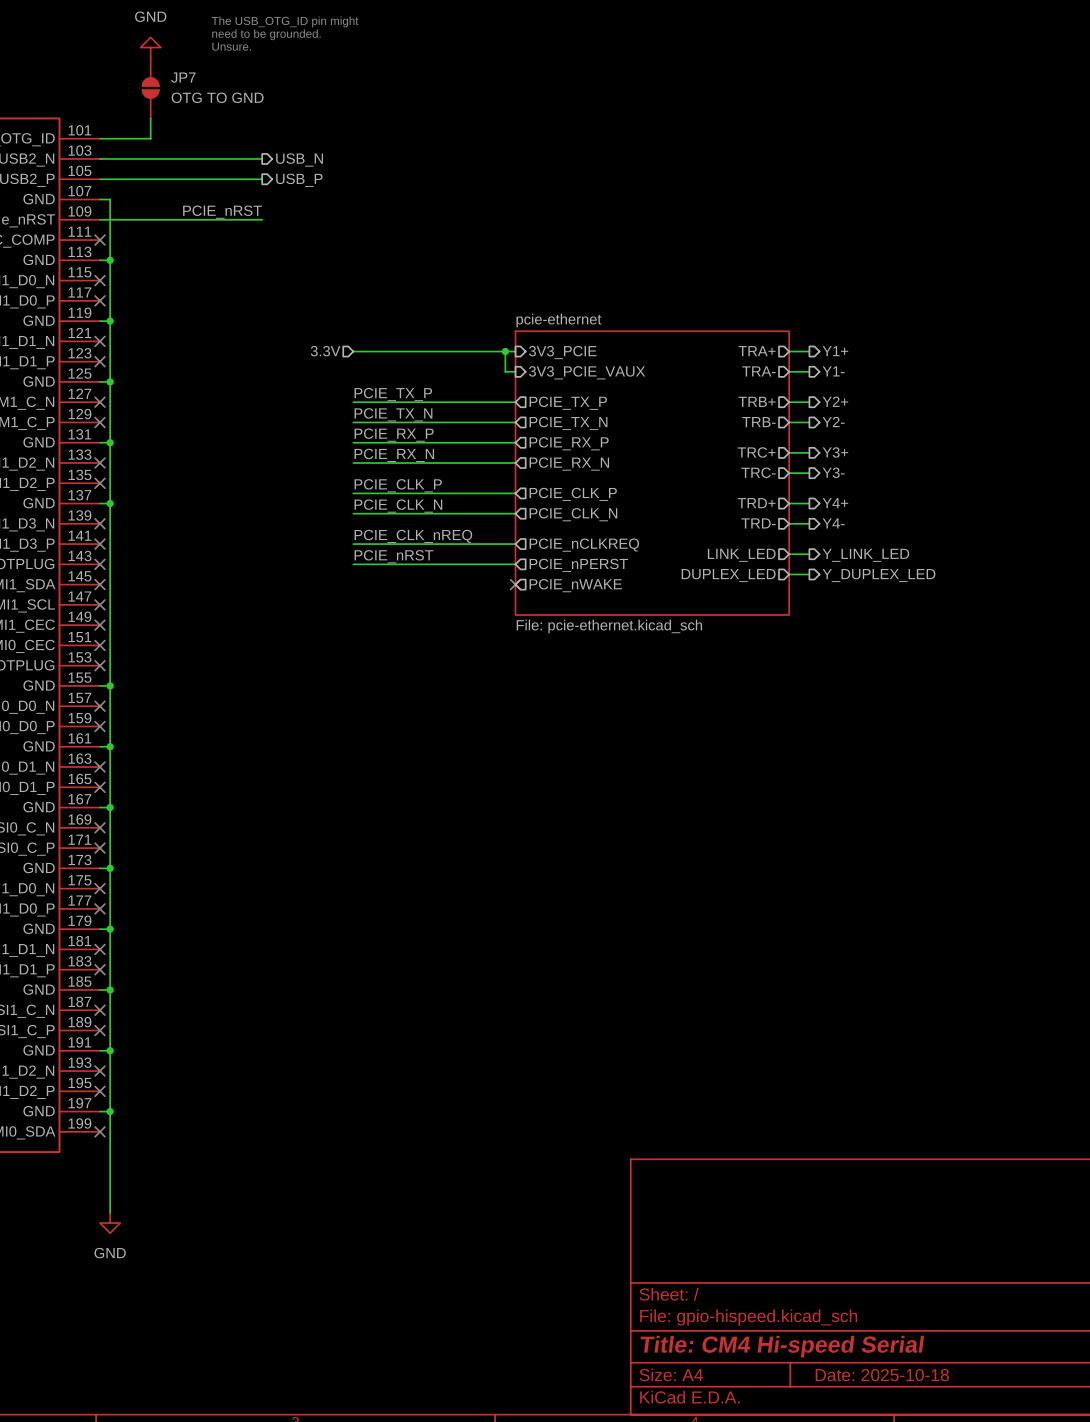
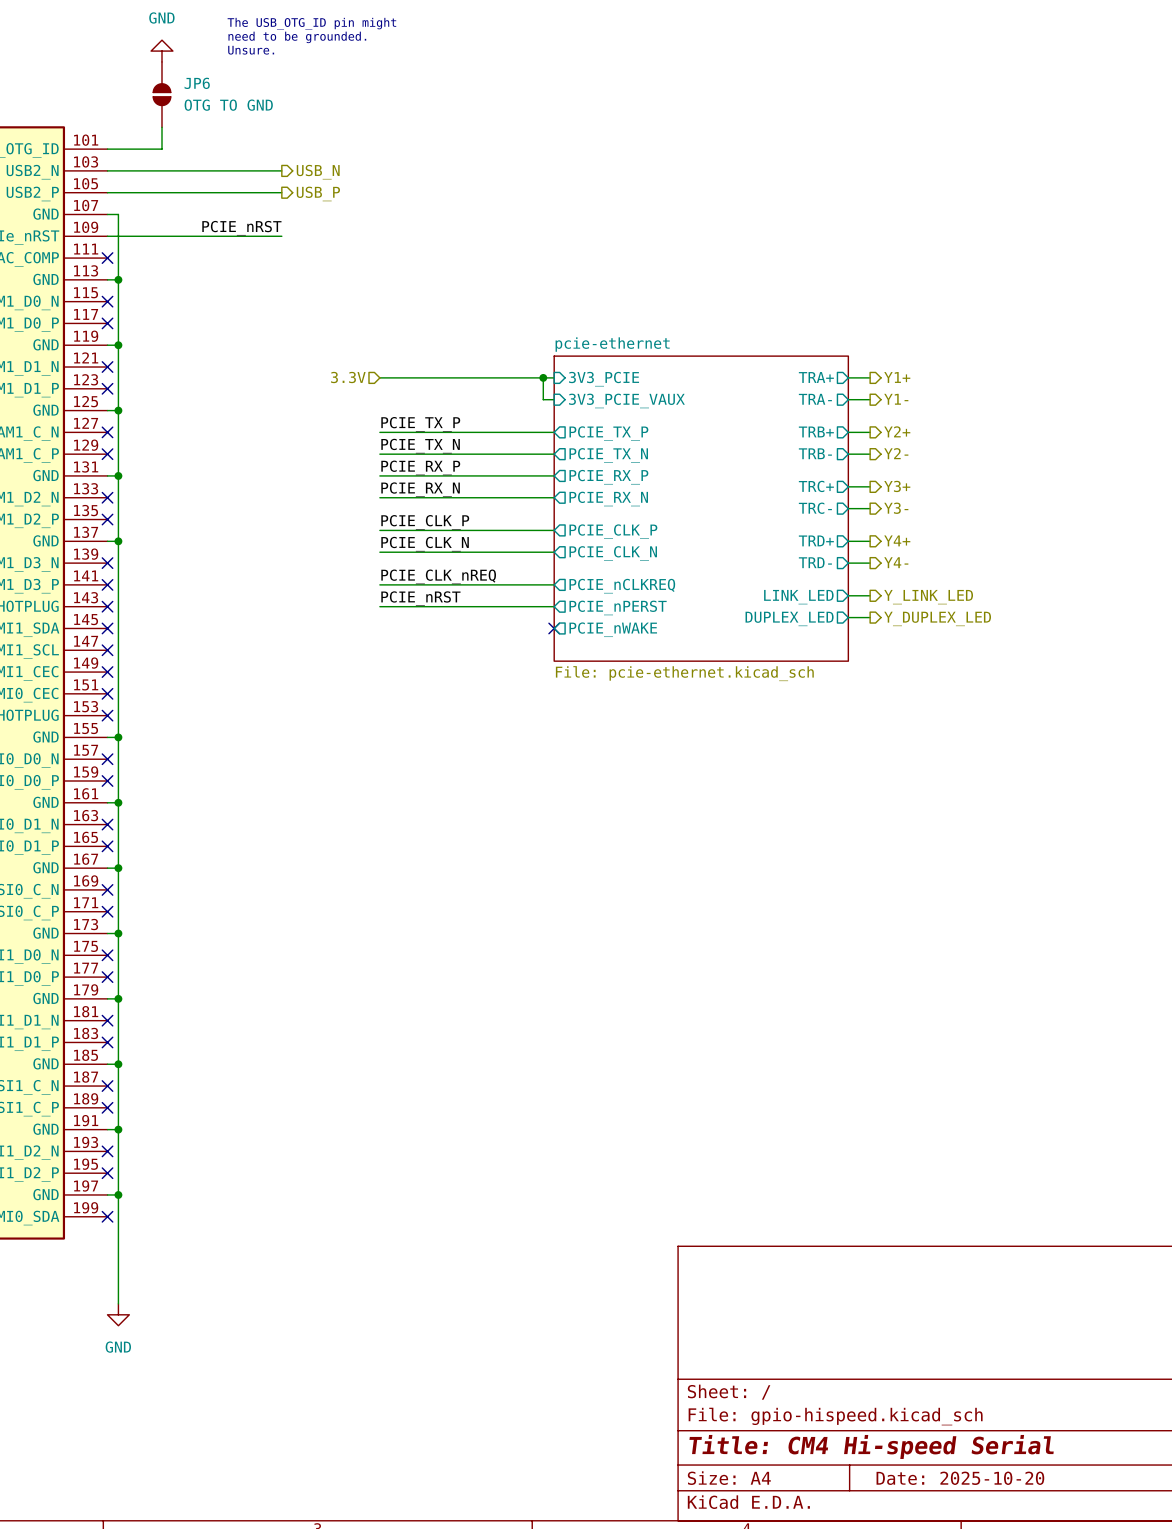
JP7 name: JP7 (183, 77) -> JP6 (197, 83)
title block: Date: 2025-10-18 (882, 1375) -> Date: 2025-10-20 (960, 1478)

